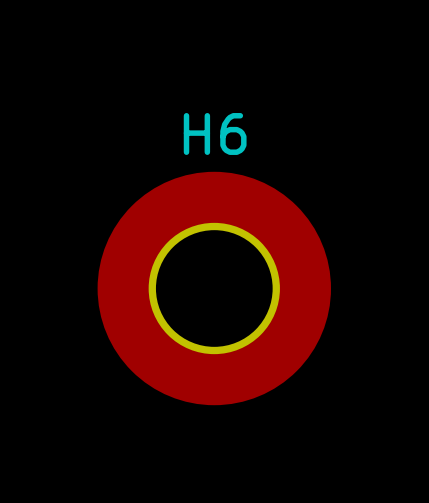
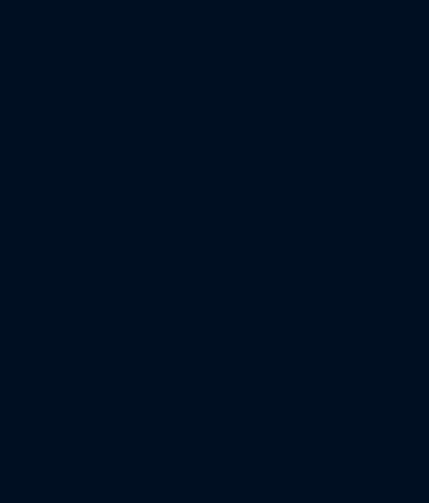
H6: (214, 288) -> none

